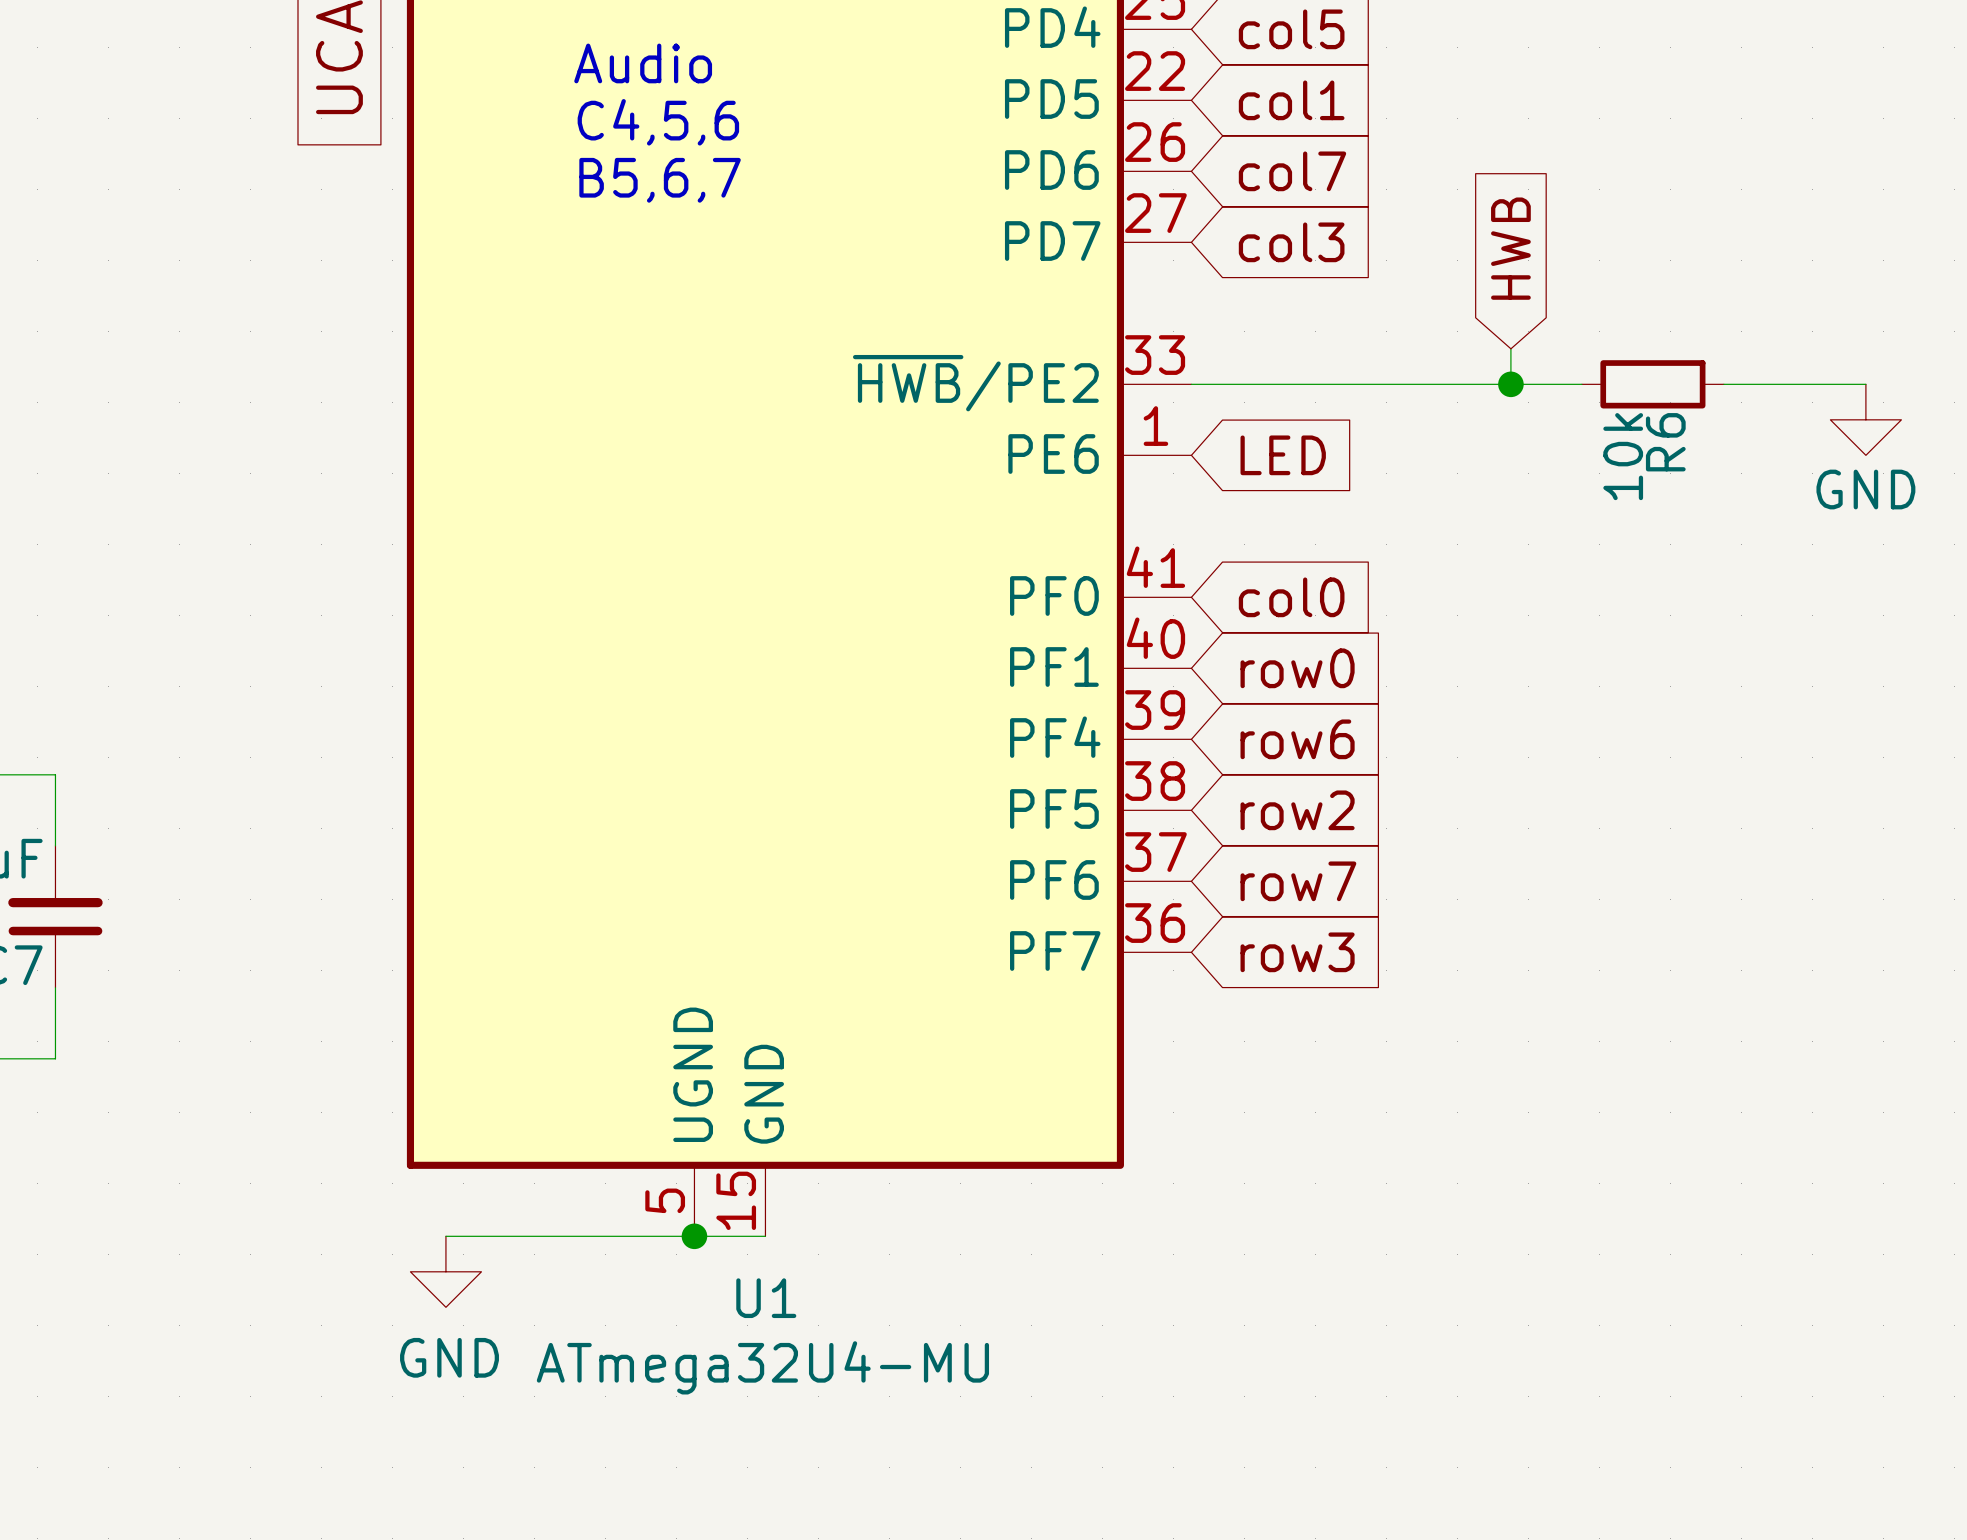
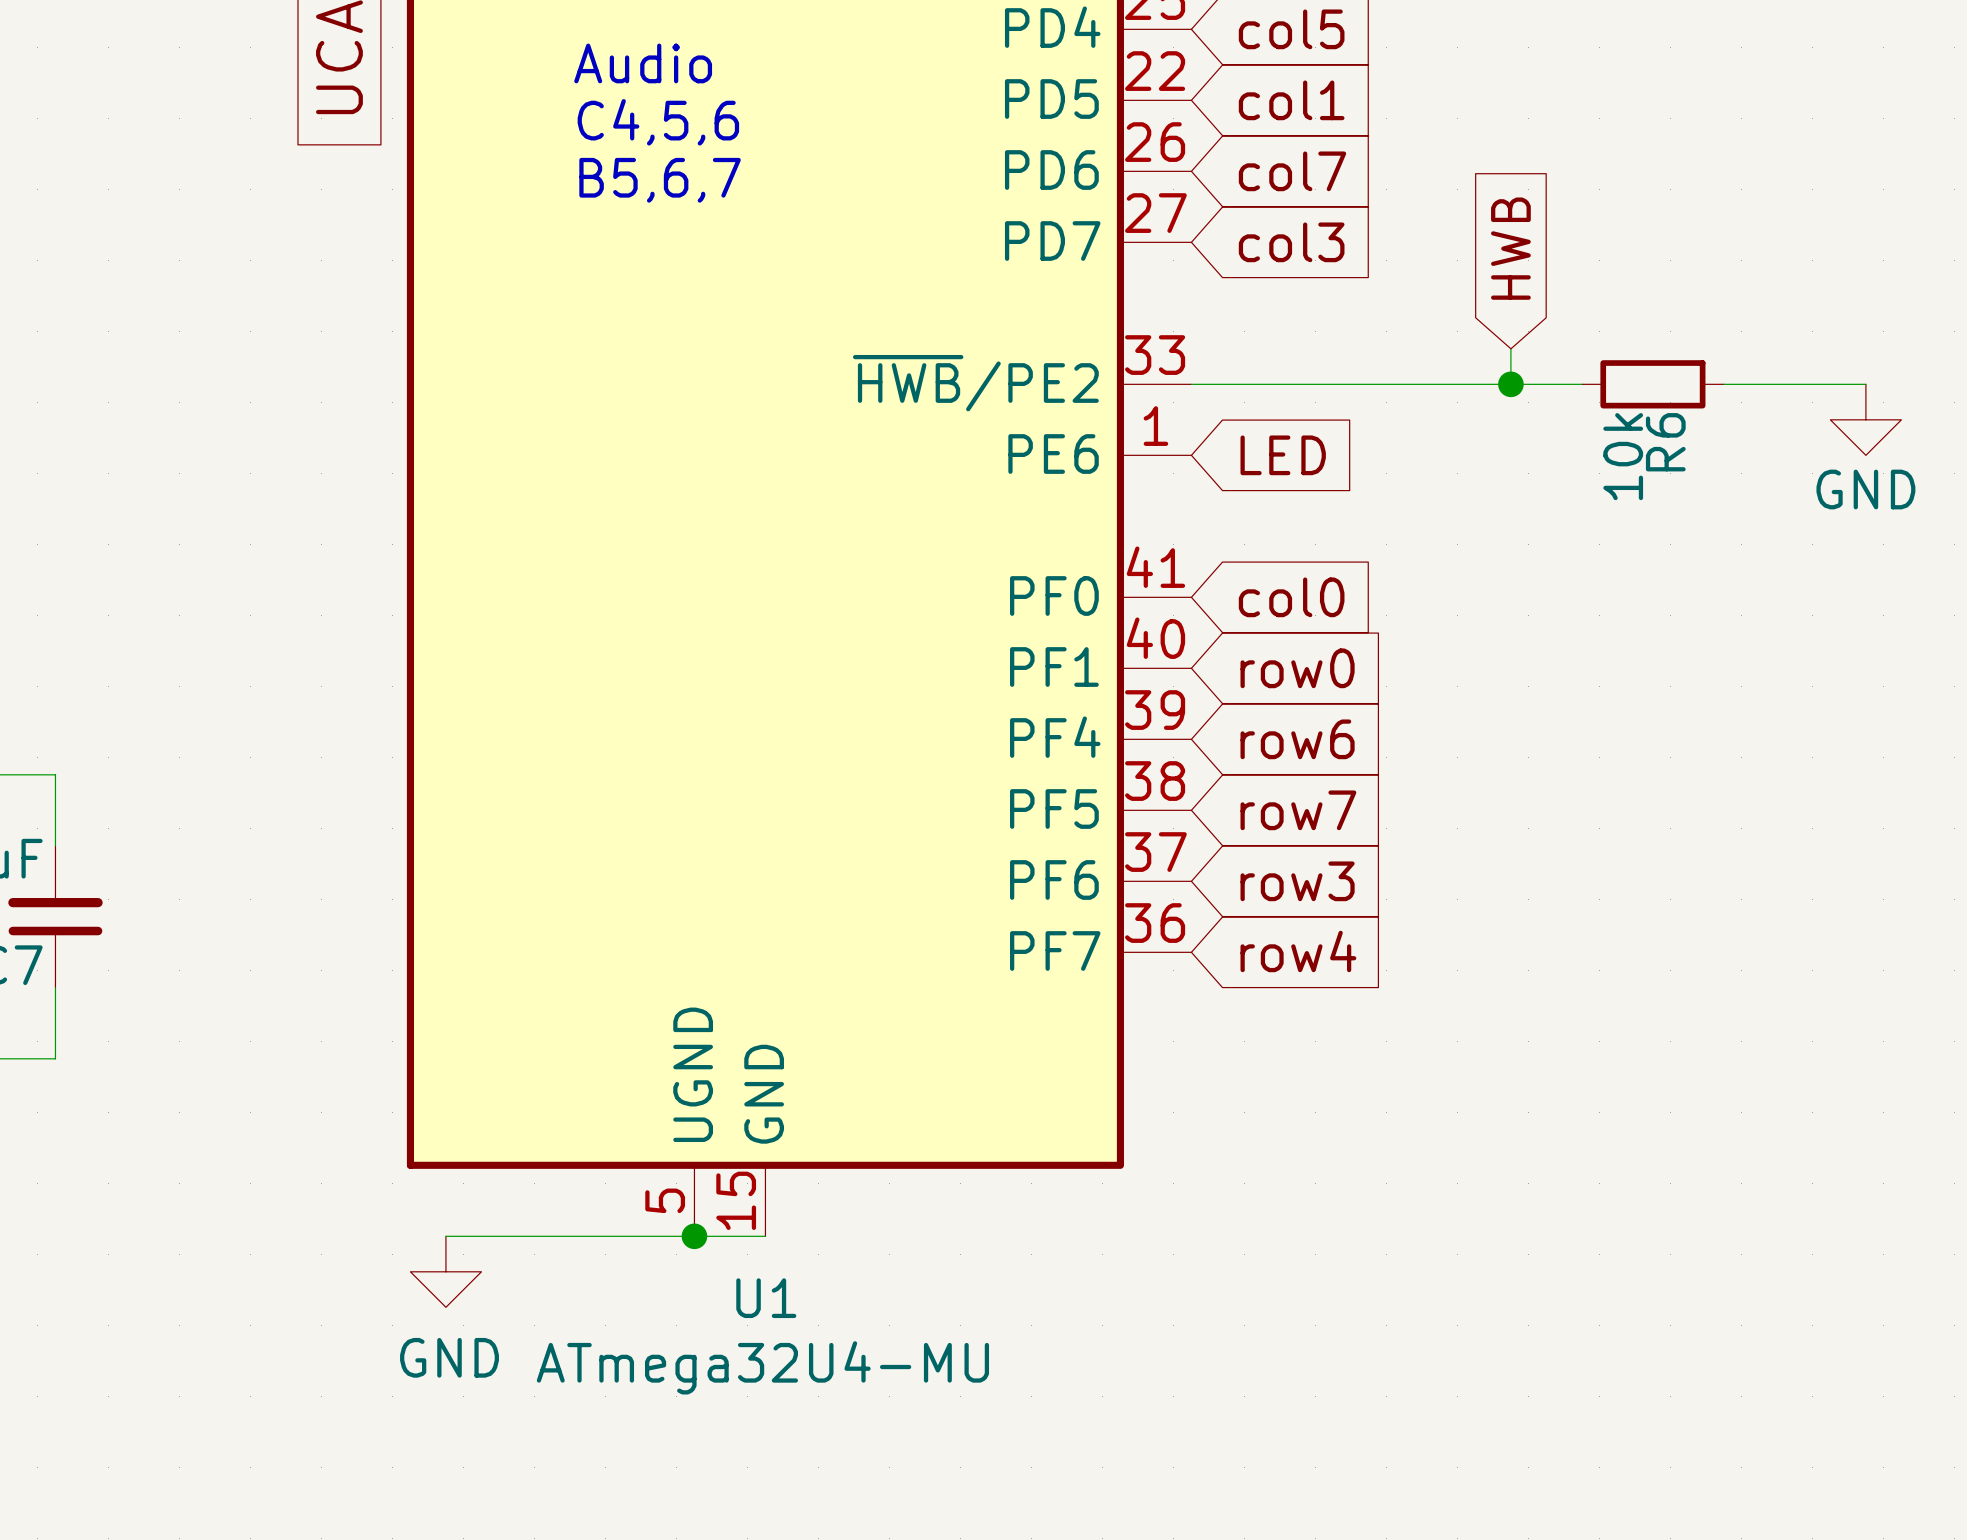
global label: row2 (1297, 810) -> row7 (1298, 810)
global label: row7 (1298, 881) -> row3 (1297, 881)
global label: row3 (1297, 952) -> row4 (1298, 951)

